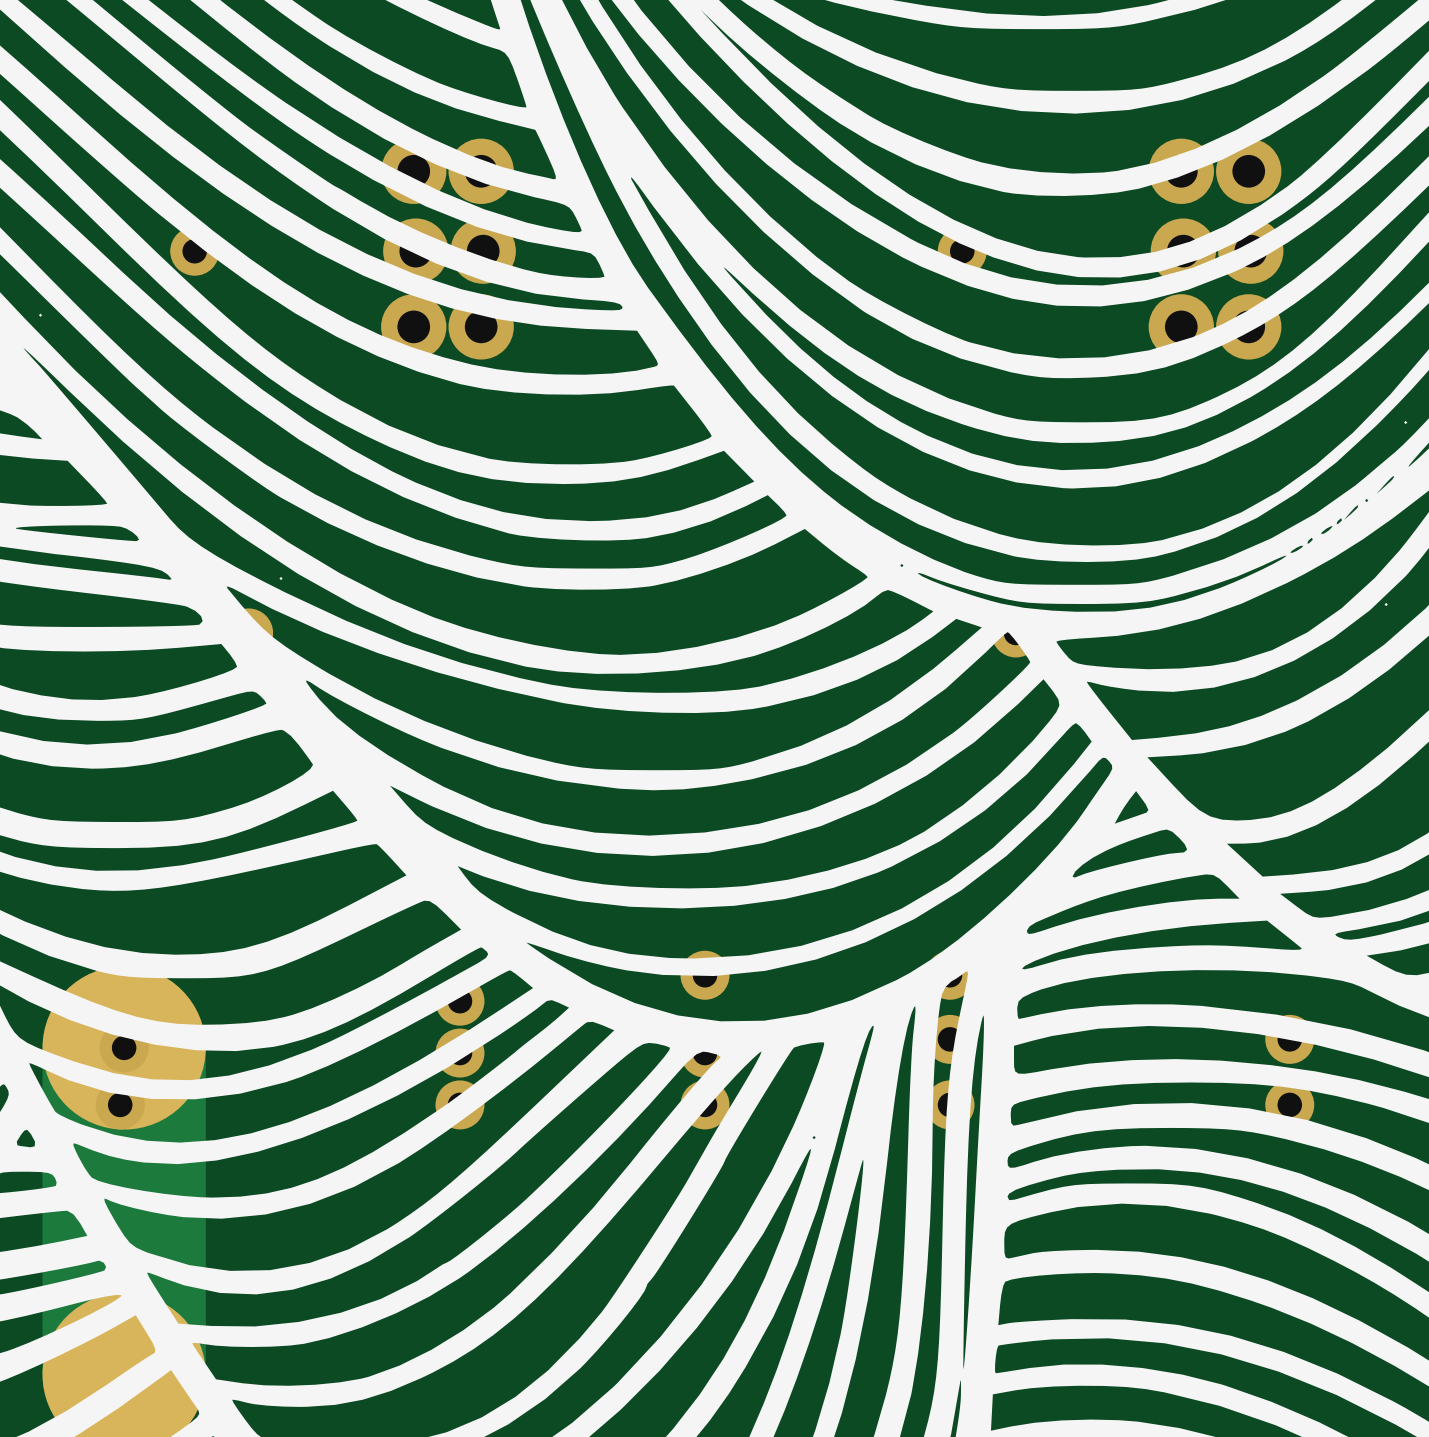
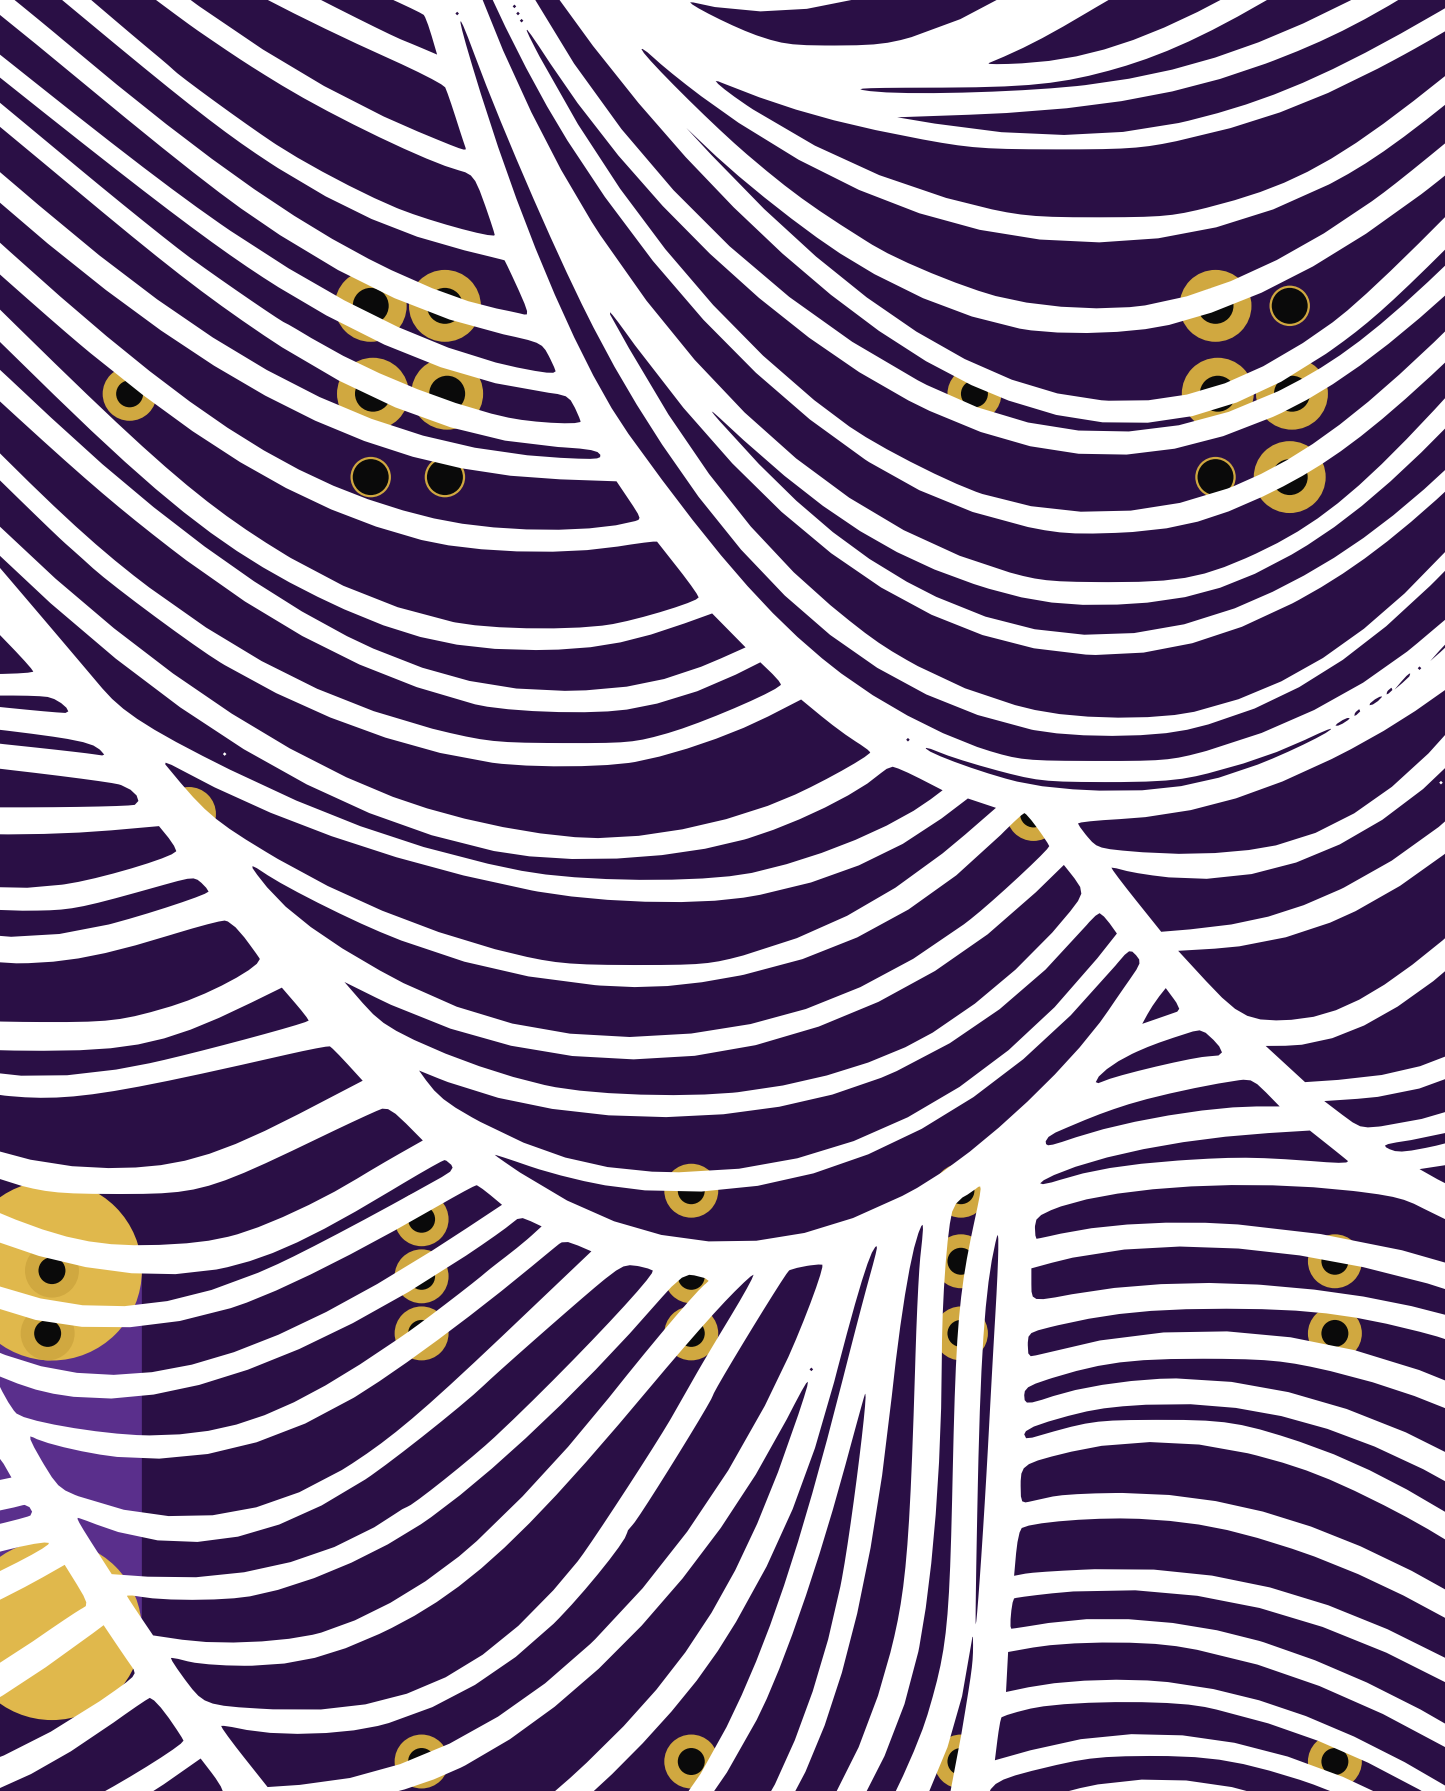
via size: [1216, 138, 1282, 204] -> [1269, 285, 1310, 327]
via size: [381, 294, 447, 360] -> [350, 456, 391, 498]
via size: [448, 294, 514, 360] -> [424, 456, 466, 498]
via size: [1148, 294, 1214, 360] -> [1195, 456, 1236, 498]

